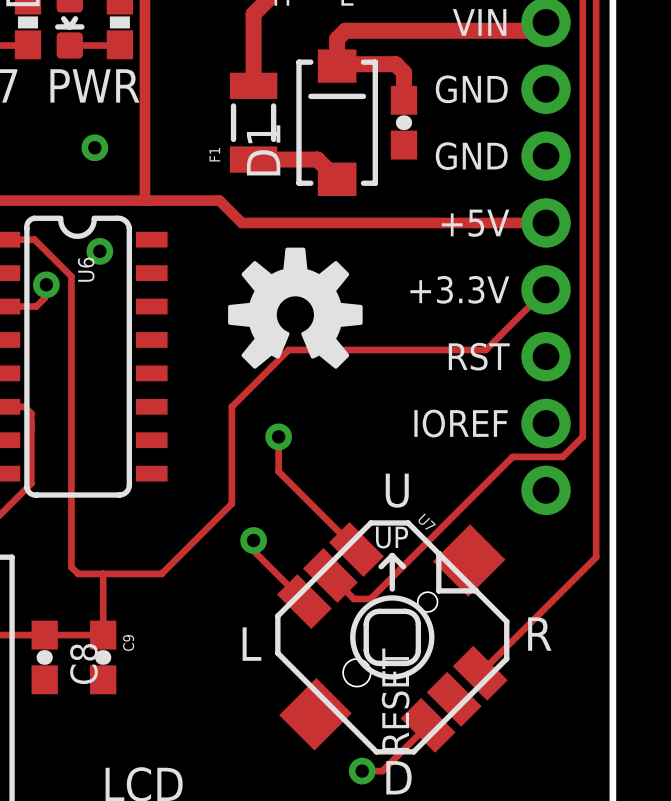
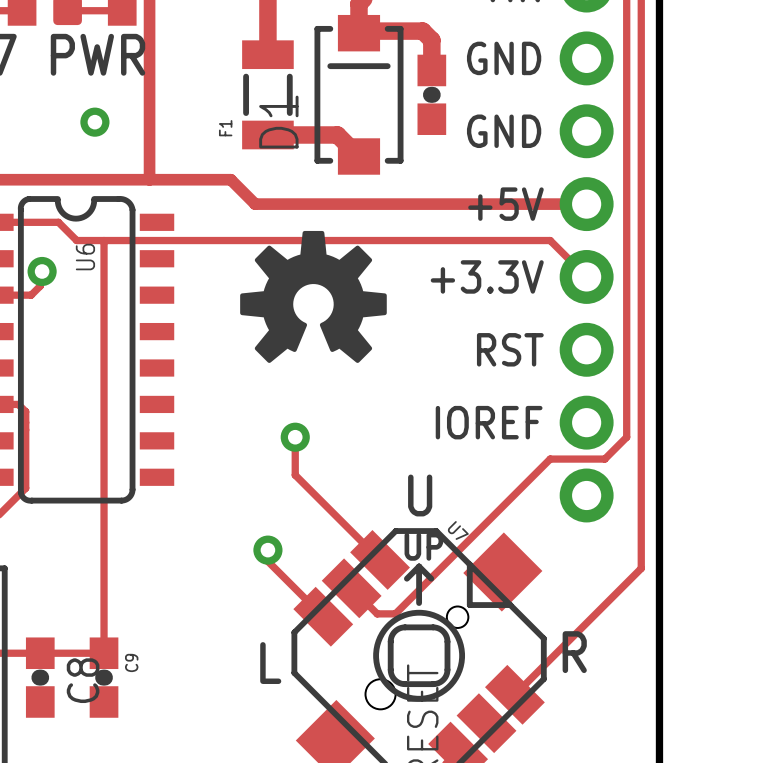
track: (34, 239) (71, 276) (71, 567) (78, 573) (161, 573) (231, 503) (231, 406) (288, 349) (485, 349) (546, 289) -> (29, 222) (58, 222) (76, 240) (550, 240) (586, 276)
via: (99, 251) -> none
track: none -> (104, 240) (104, 586)

